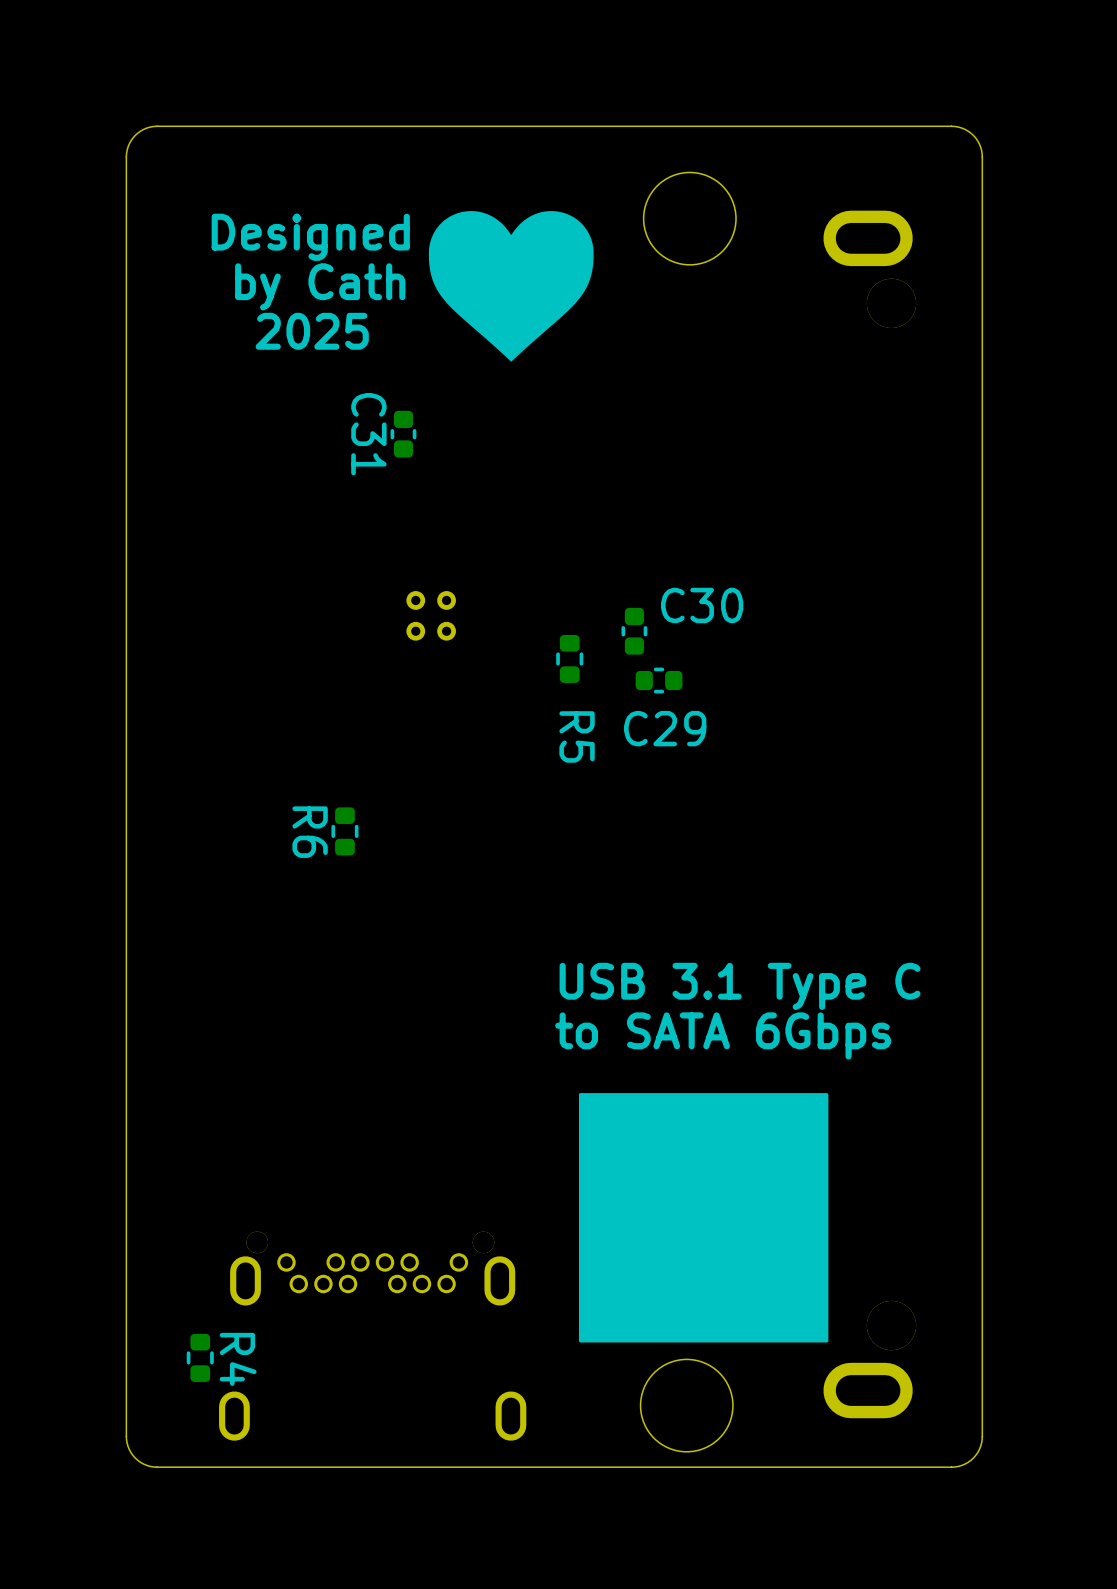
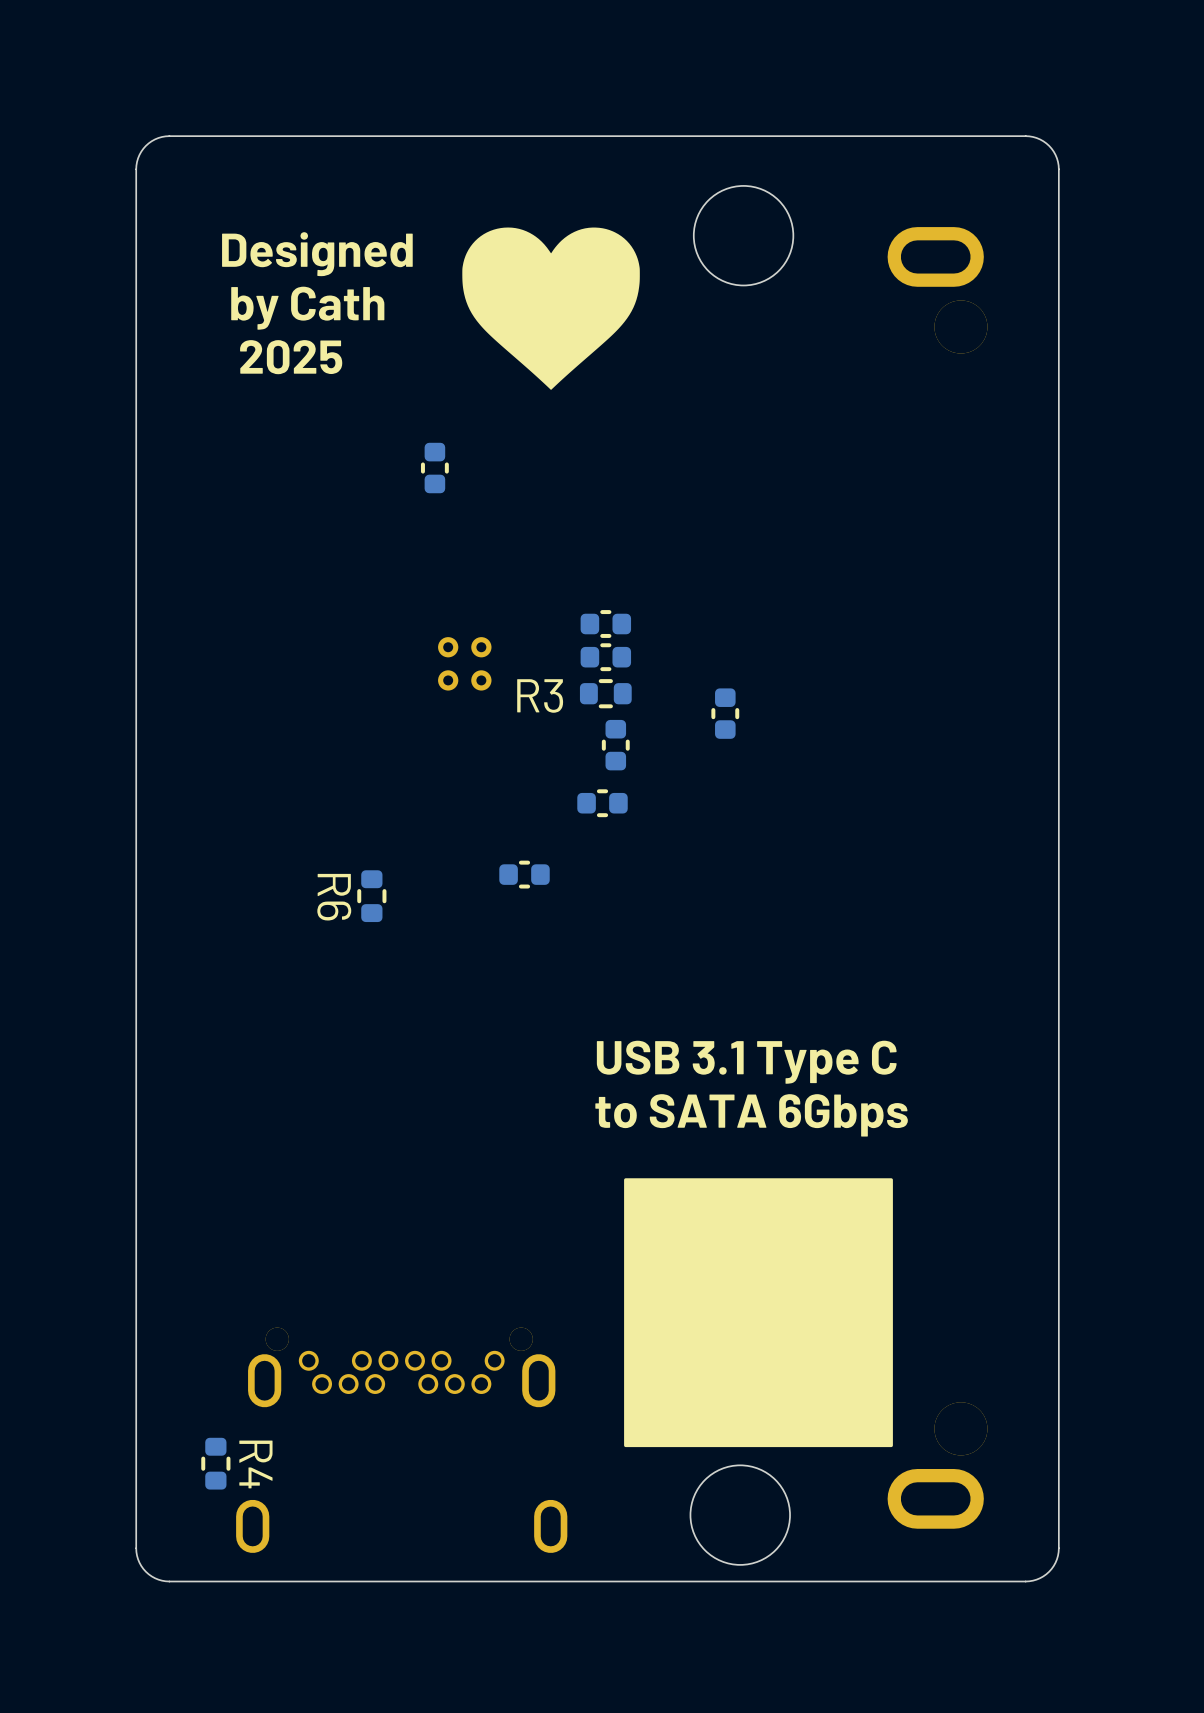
C31 name: C31 (368, 434) -> none
part: none -> (605, 624)
part: none -> (605, 657)
C30: (634, 631) -> none
R3: none -> (605, 693)
R5: (569, 658) -> none
part: none -> (725, 713)
C29: (659, 680) -> none
part: none -> (615, 745)
part: none -> (602, 803)
part: none -> (524, 874)

